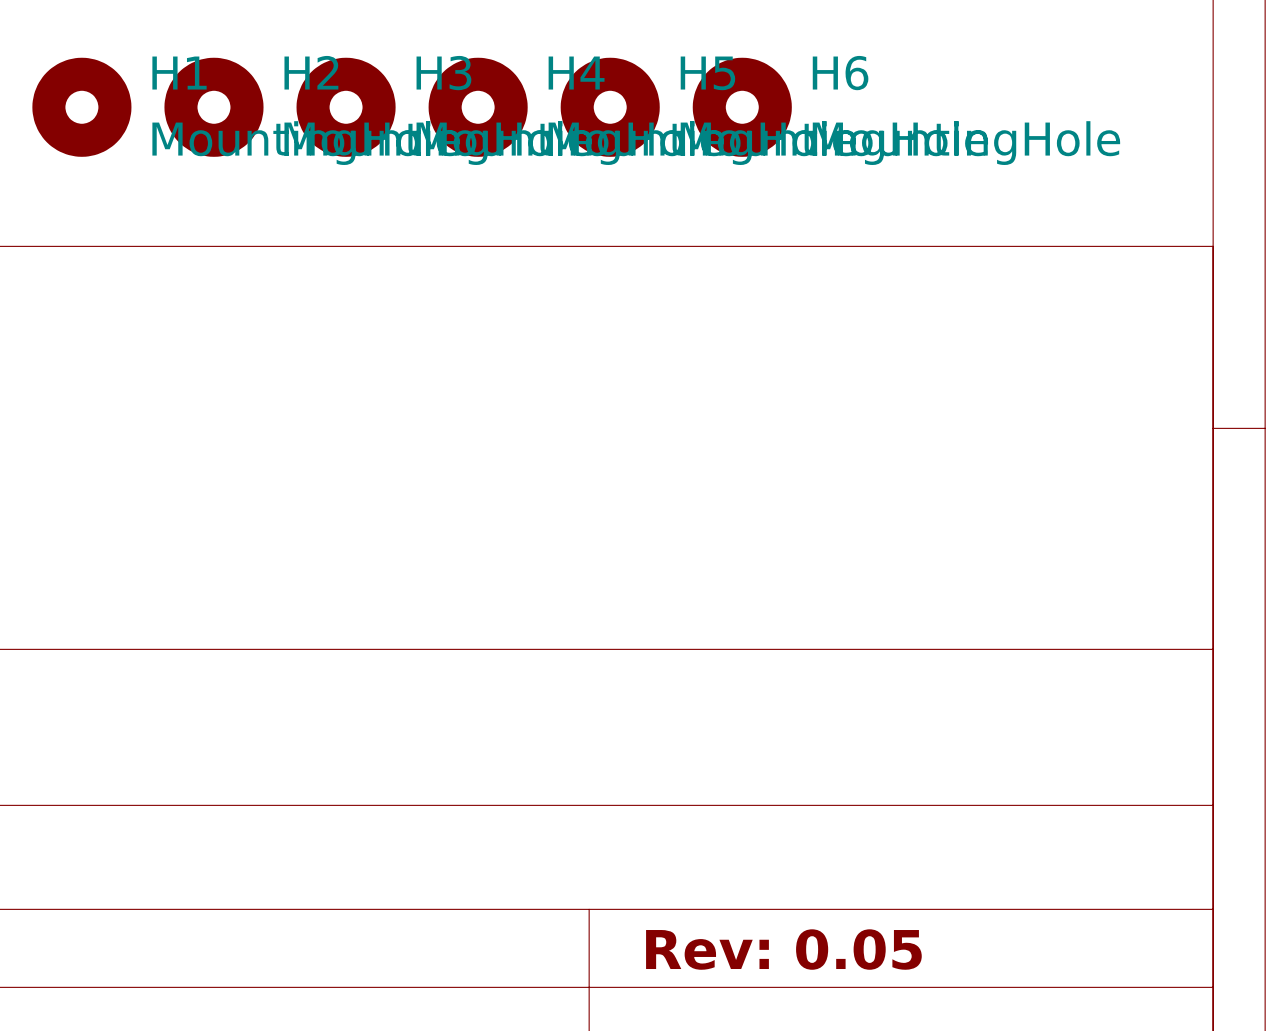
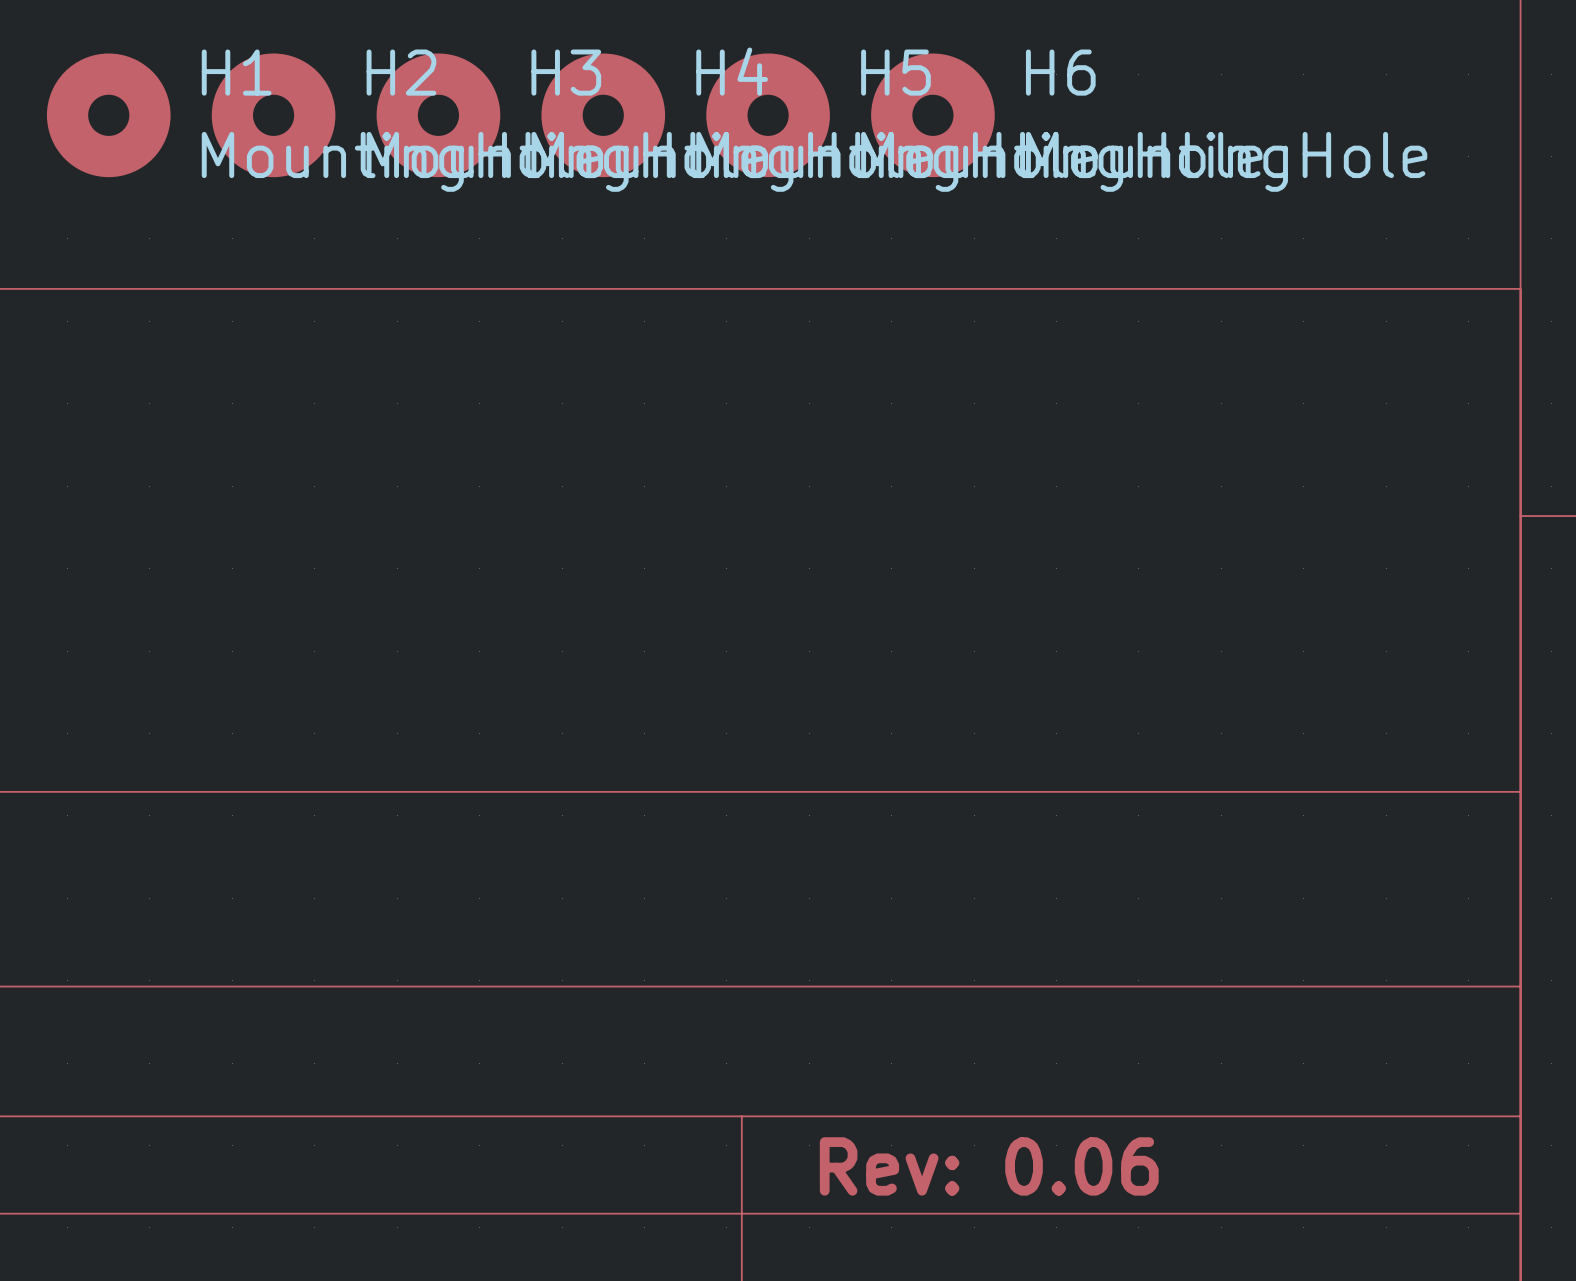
title block: Rev: 0.05 (783, 949) -> Rev: 0.06 (989, 1166)

